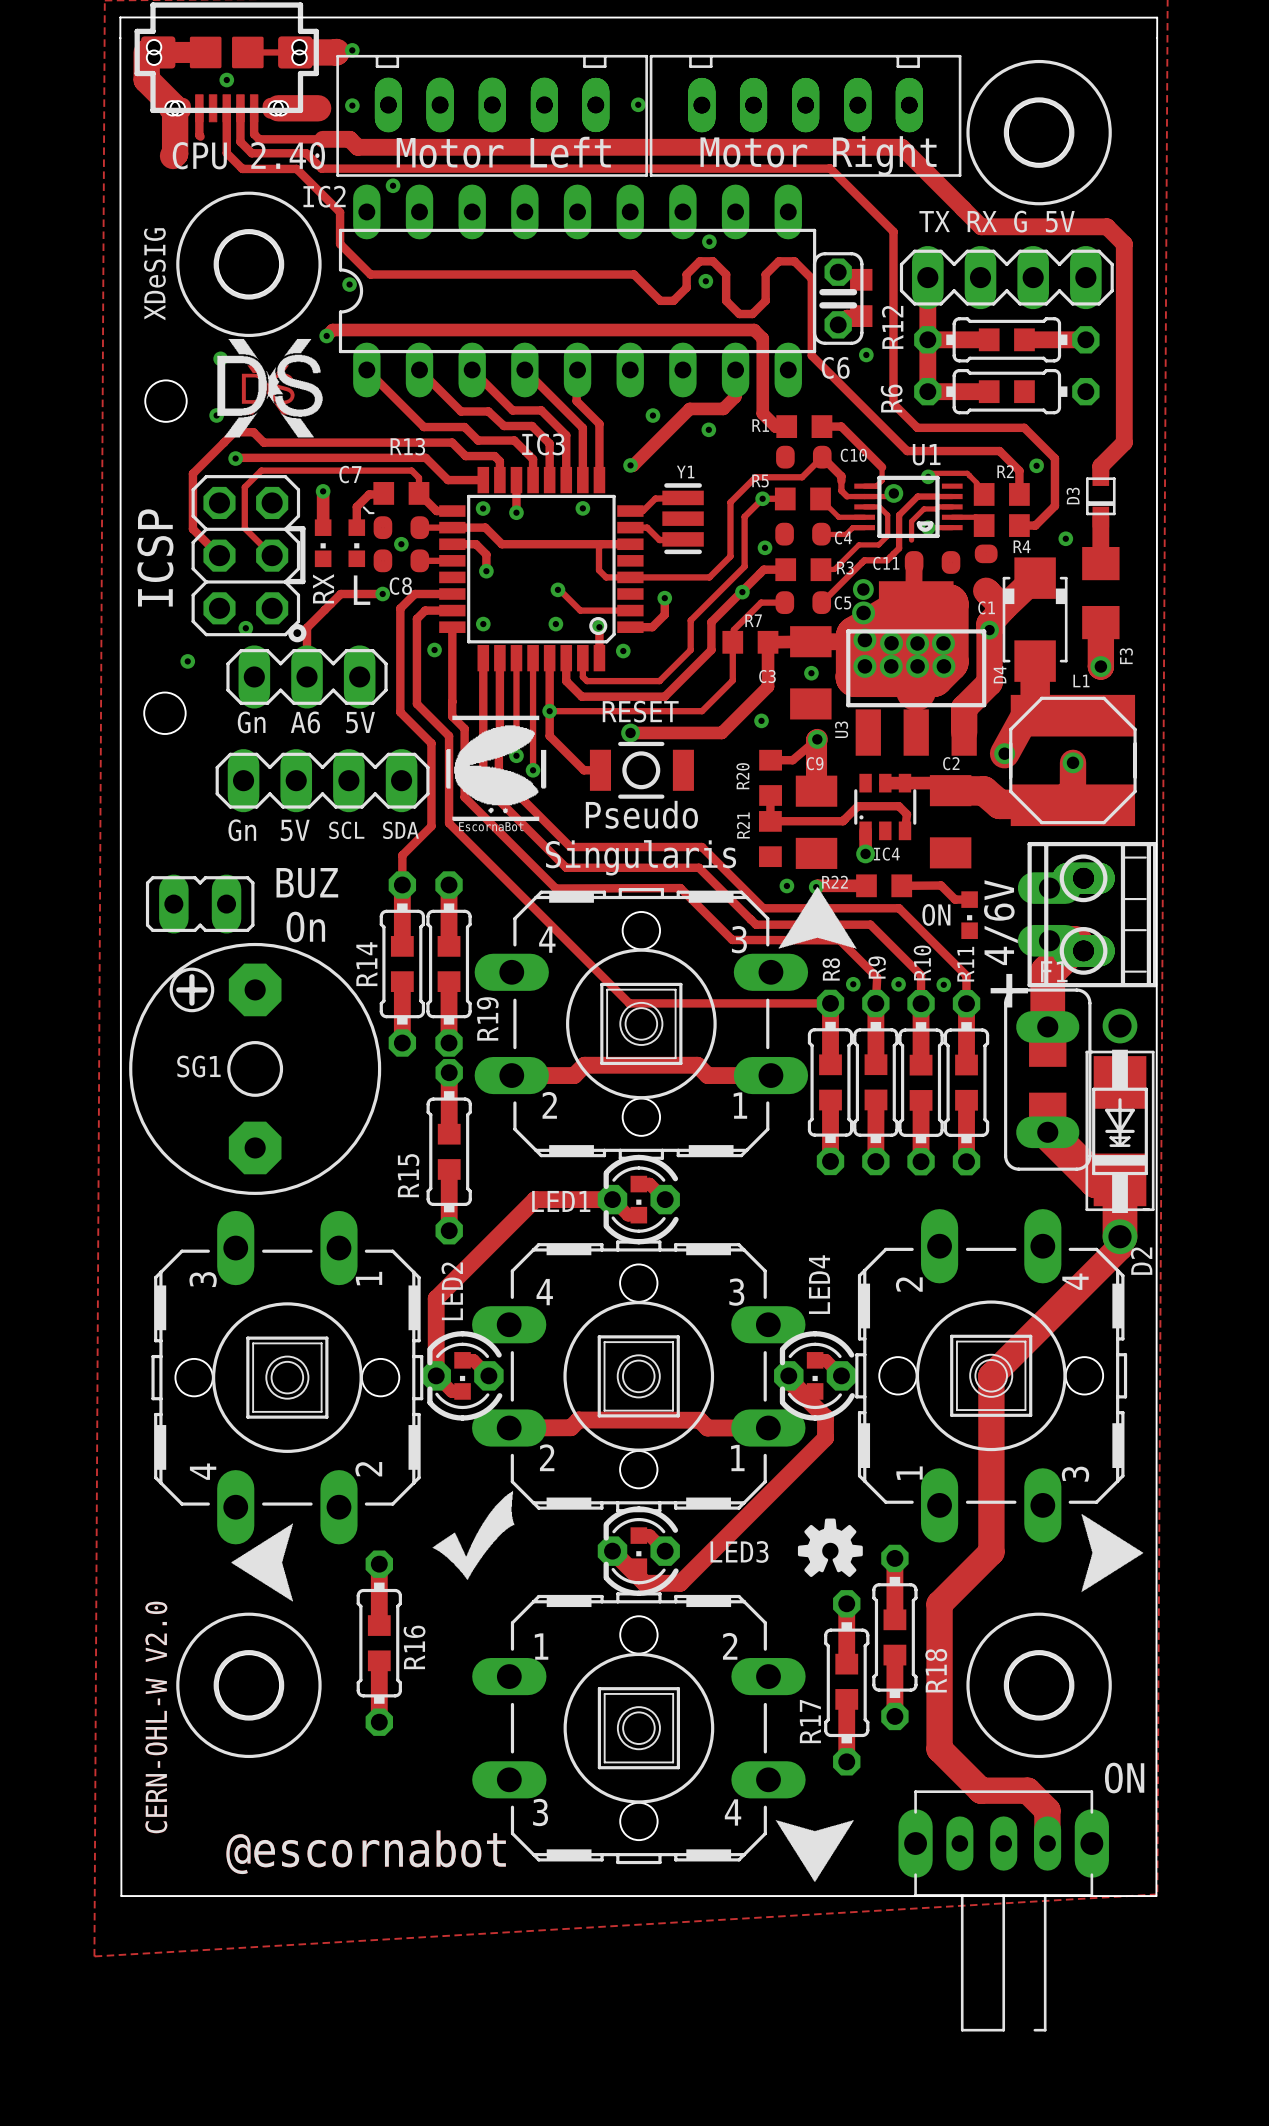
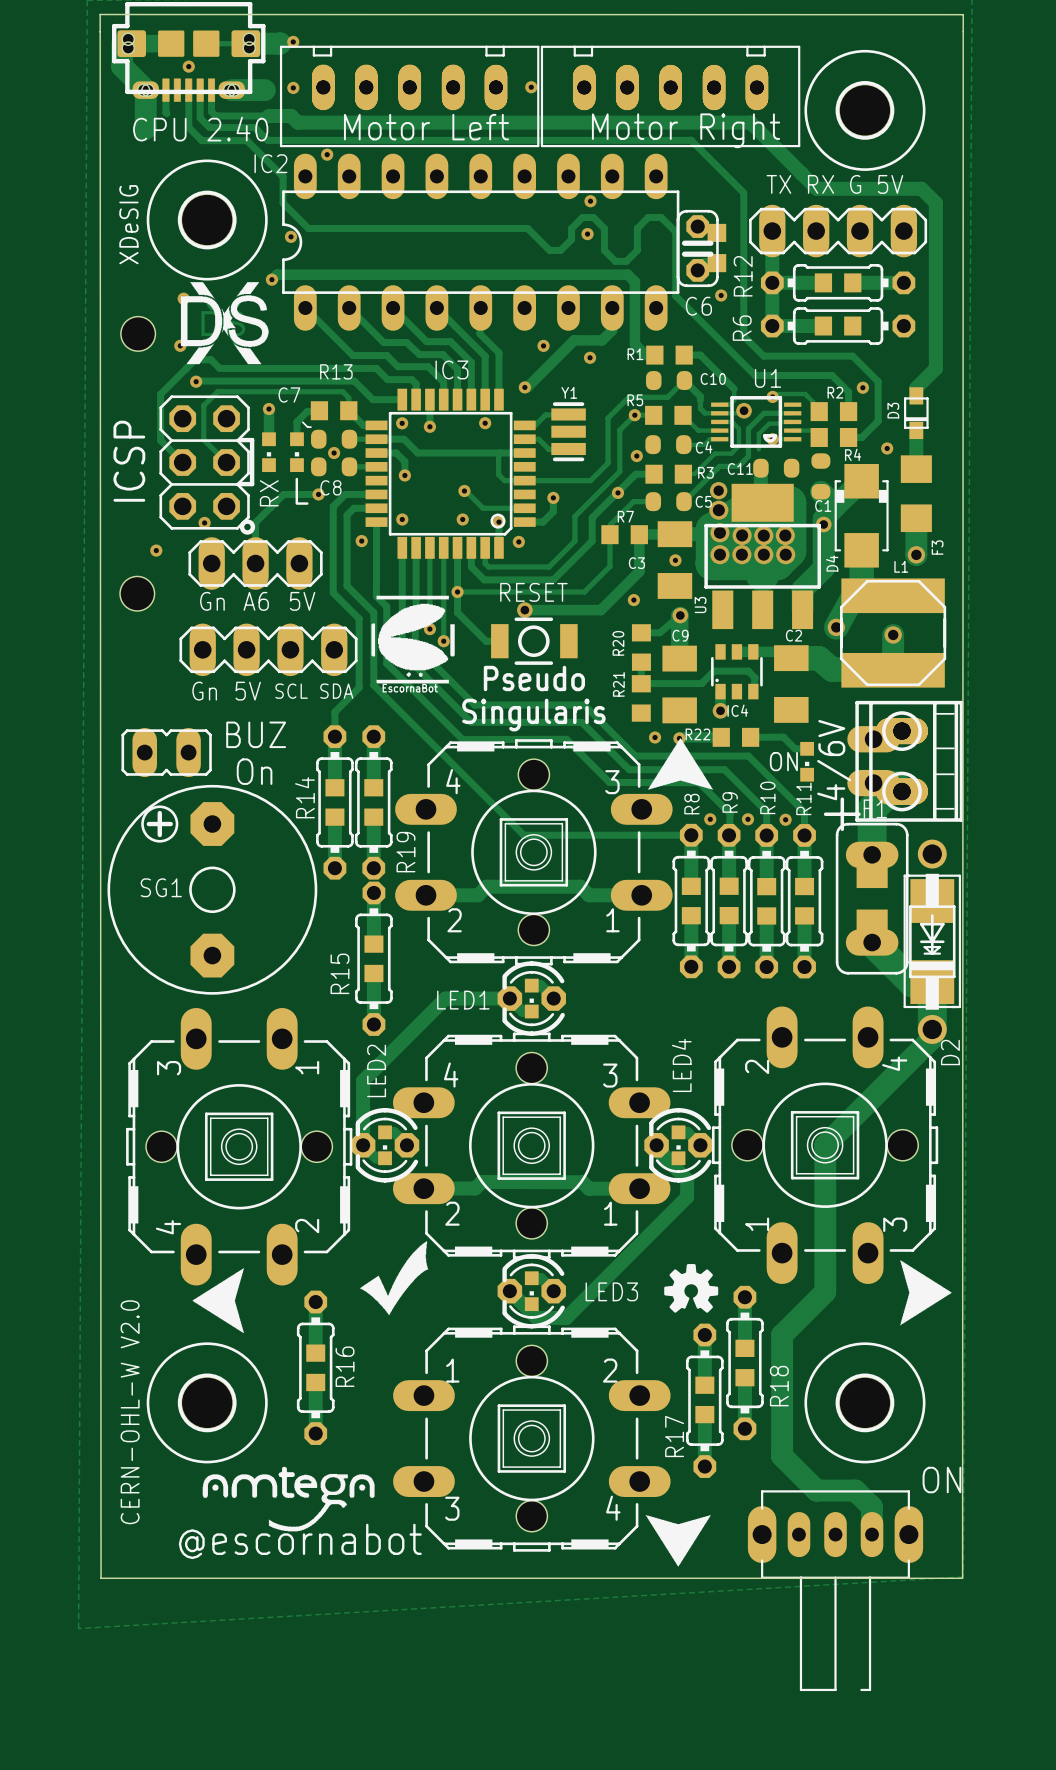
drawing: none -> [202, 1466, 375, 1532]

